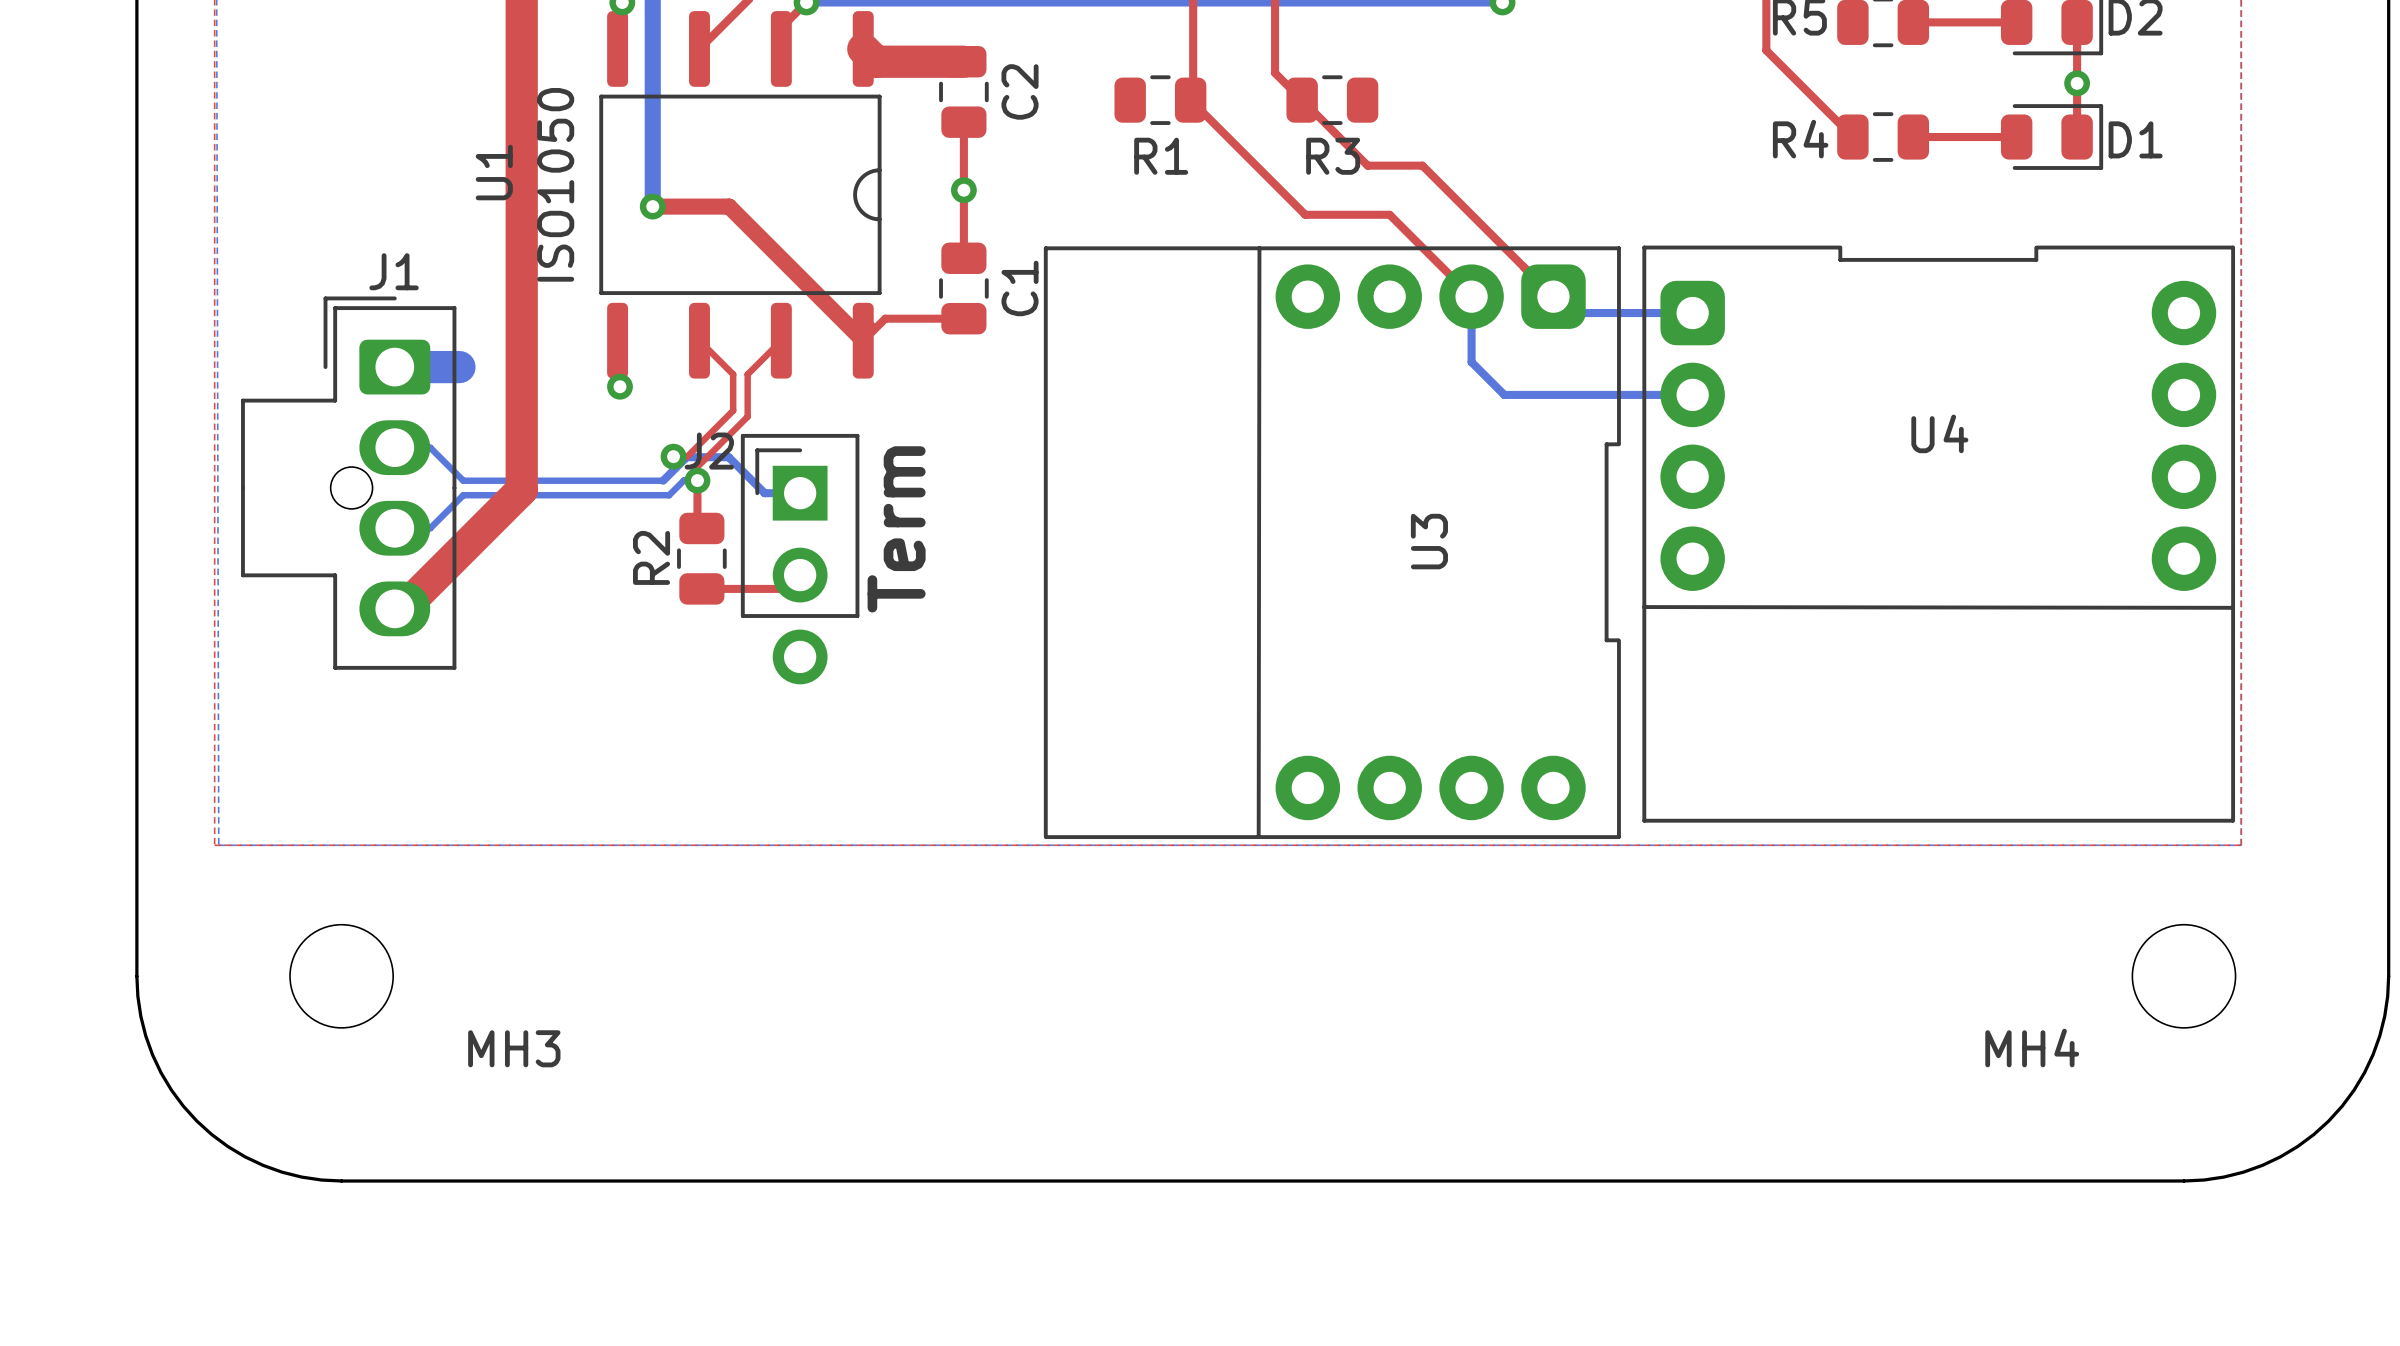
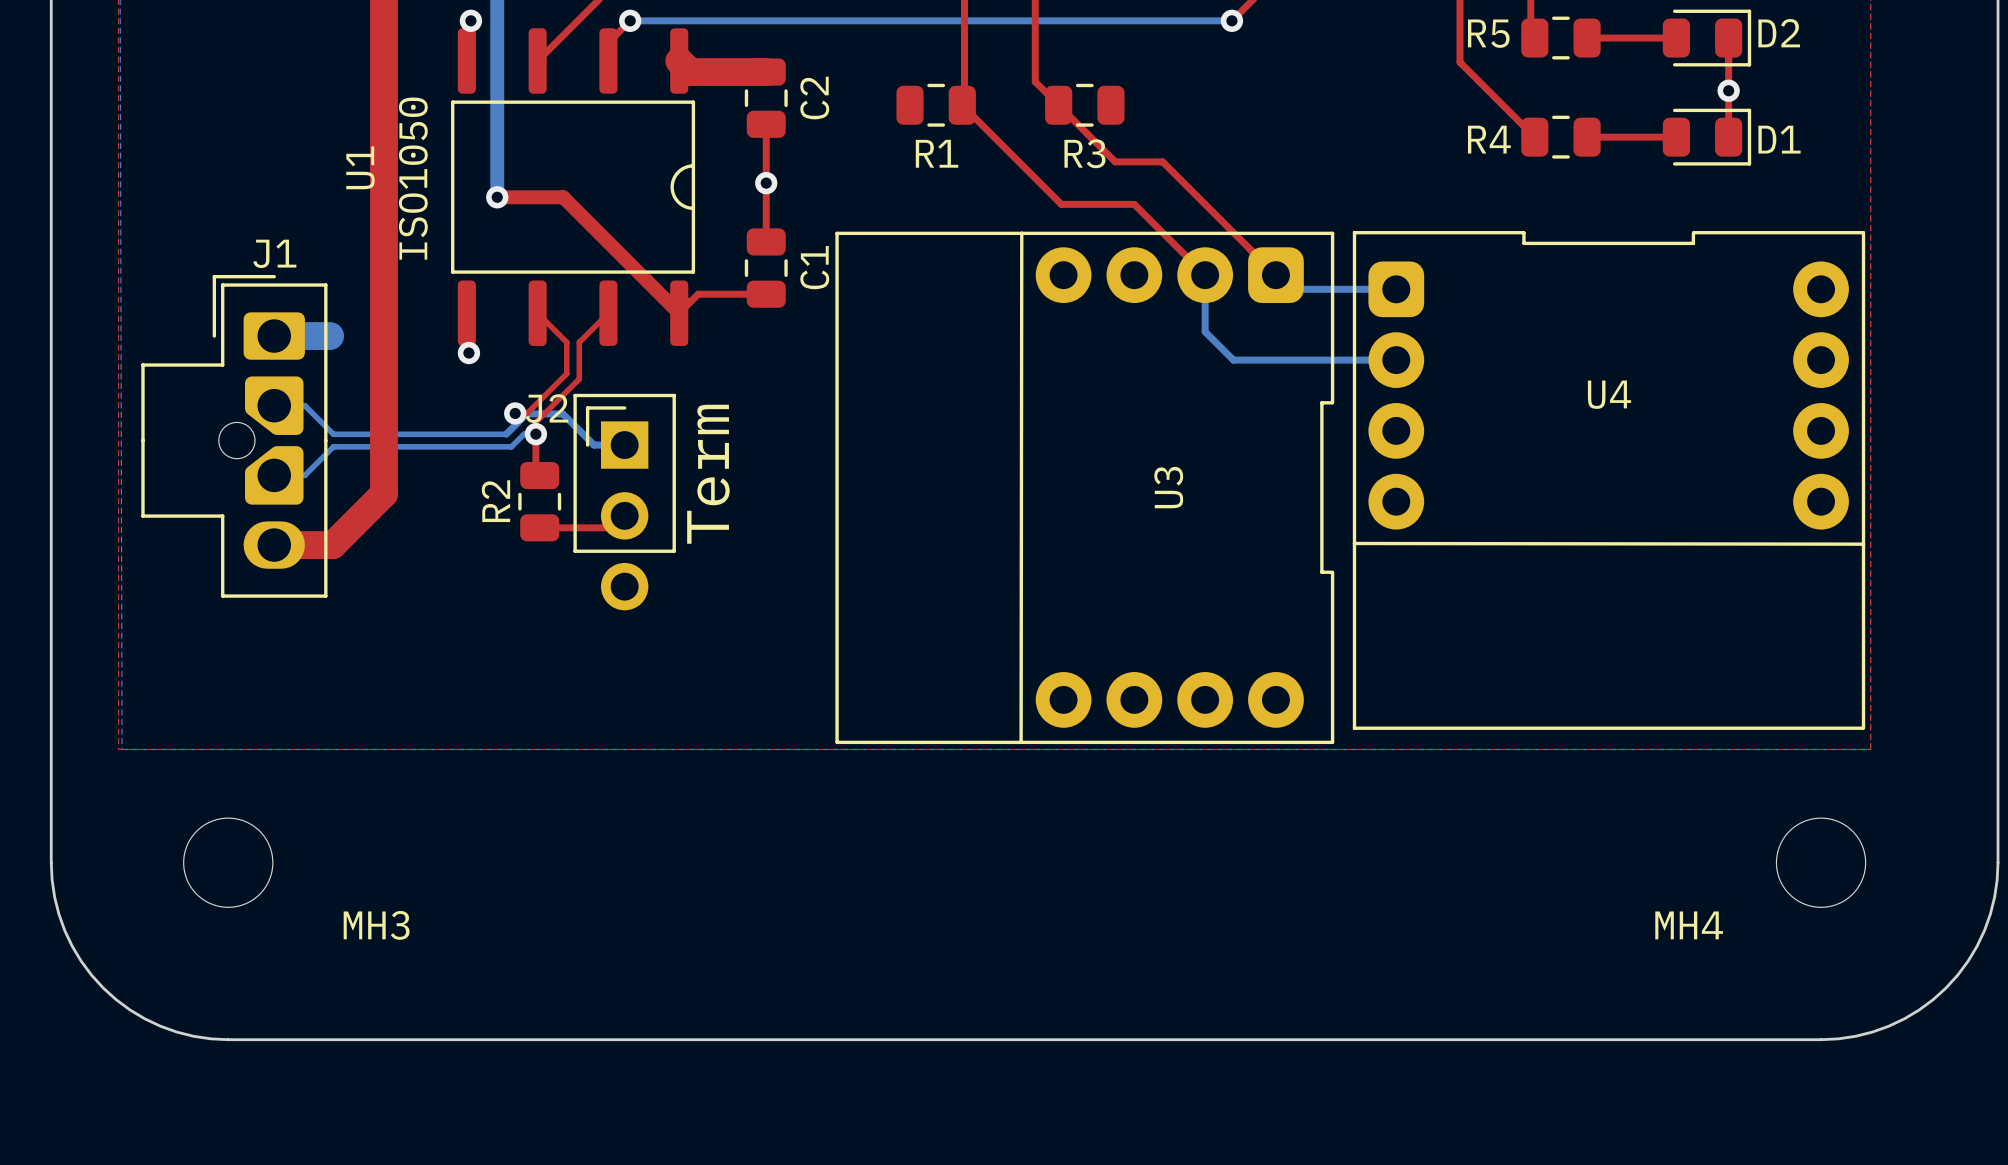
J1 footprint: [241, 296, 457, 670] -> [141, 275, 328, 598]
top track: (521, 490) (402, 608) -> (383, 442) (383, 493) (332, 545) (281, 545)

